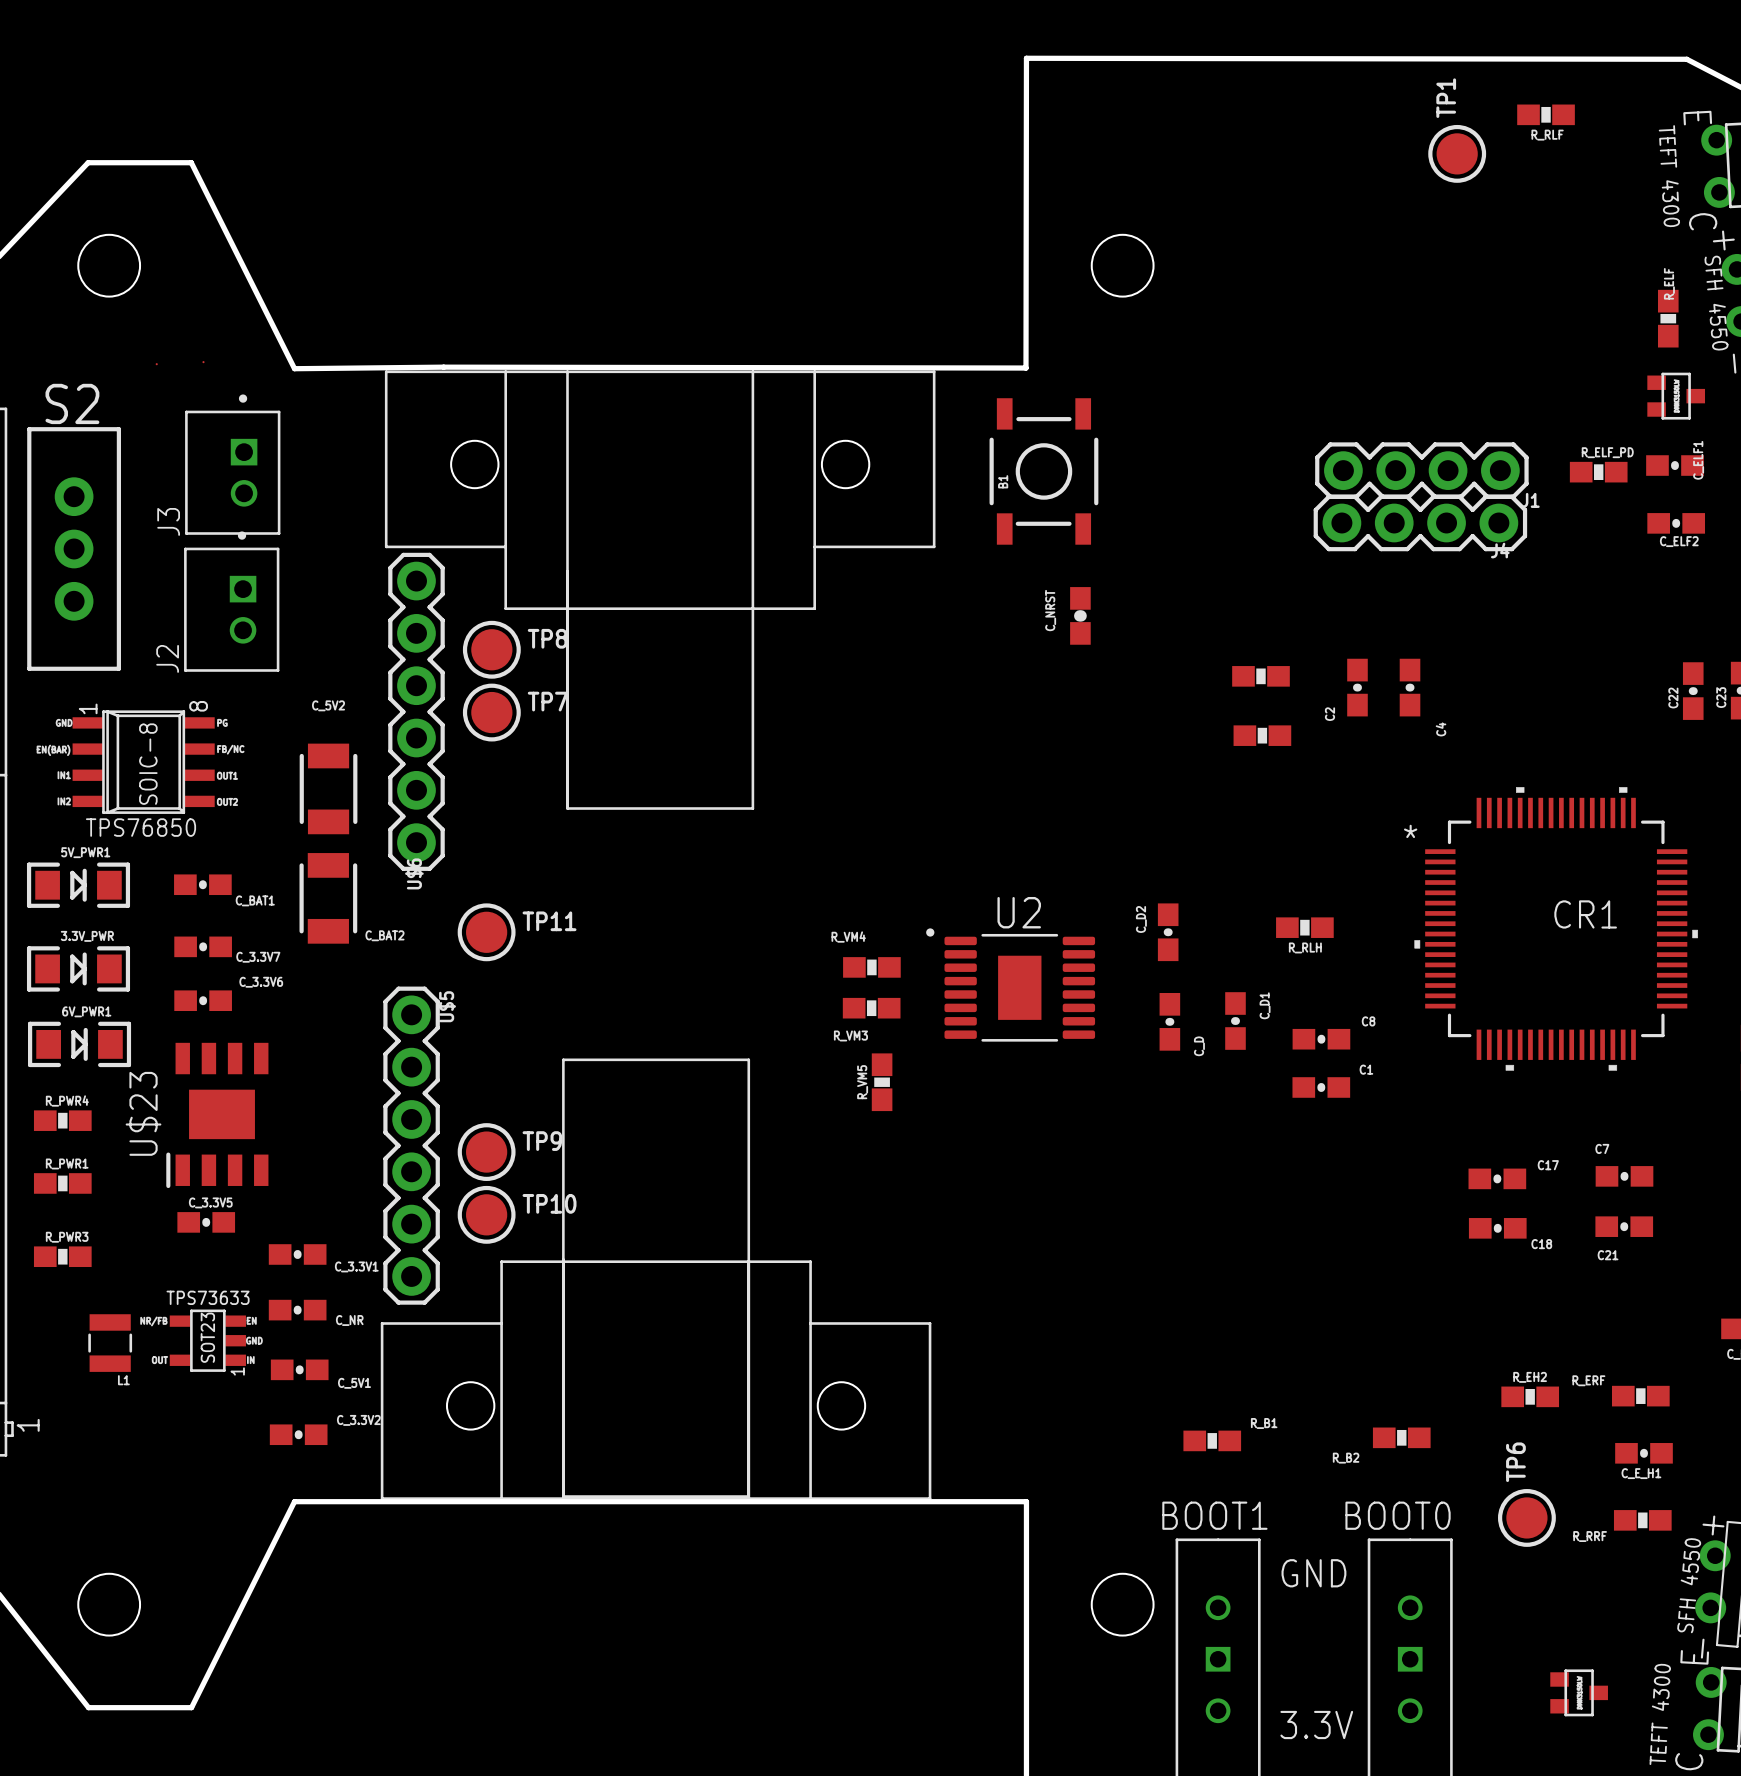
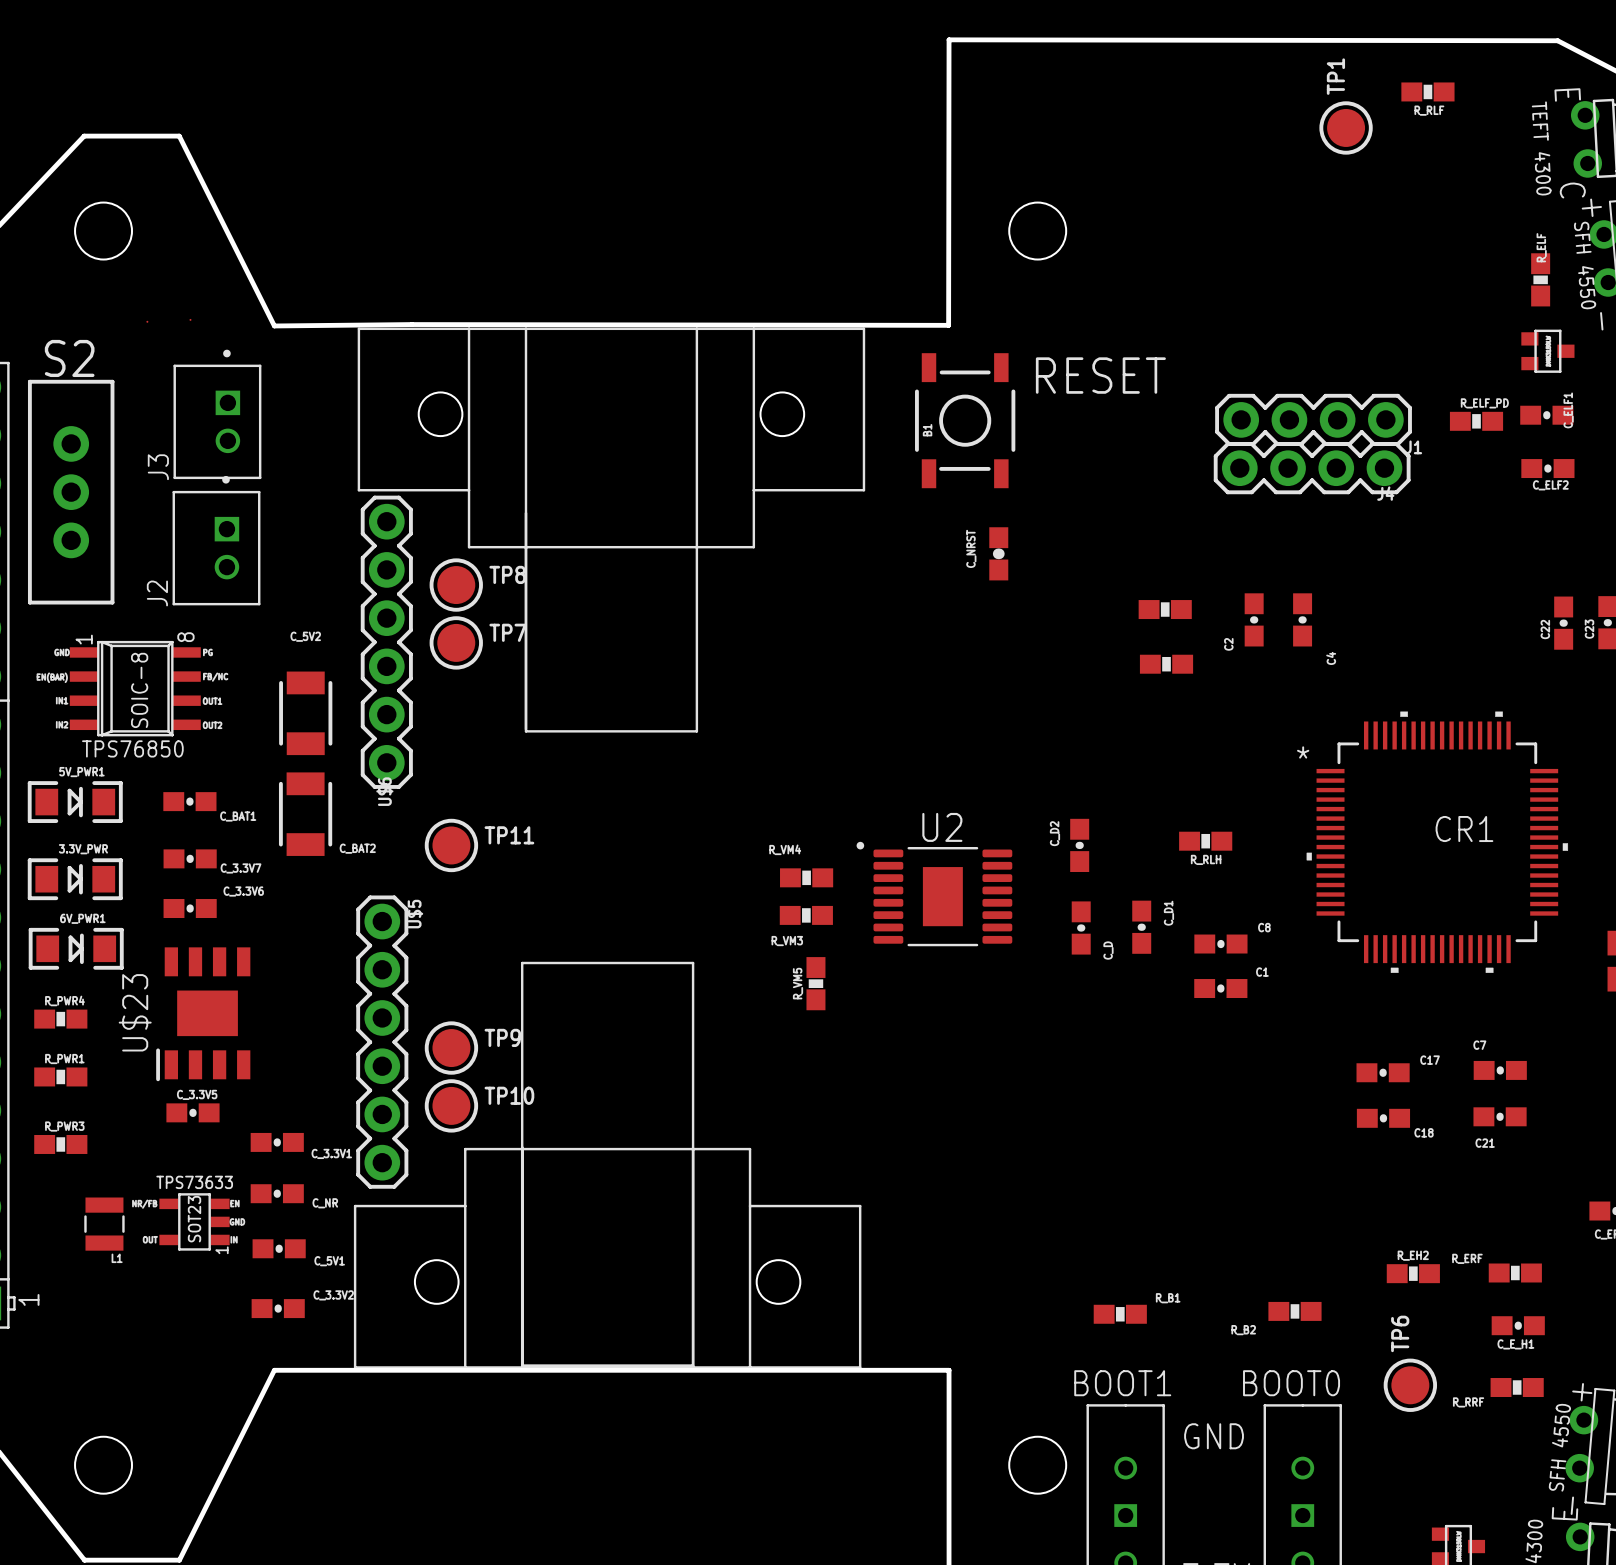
text: none -> RESET (1100, 375)

